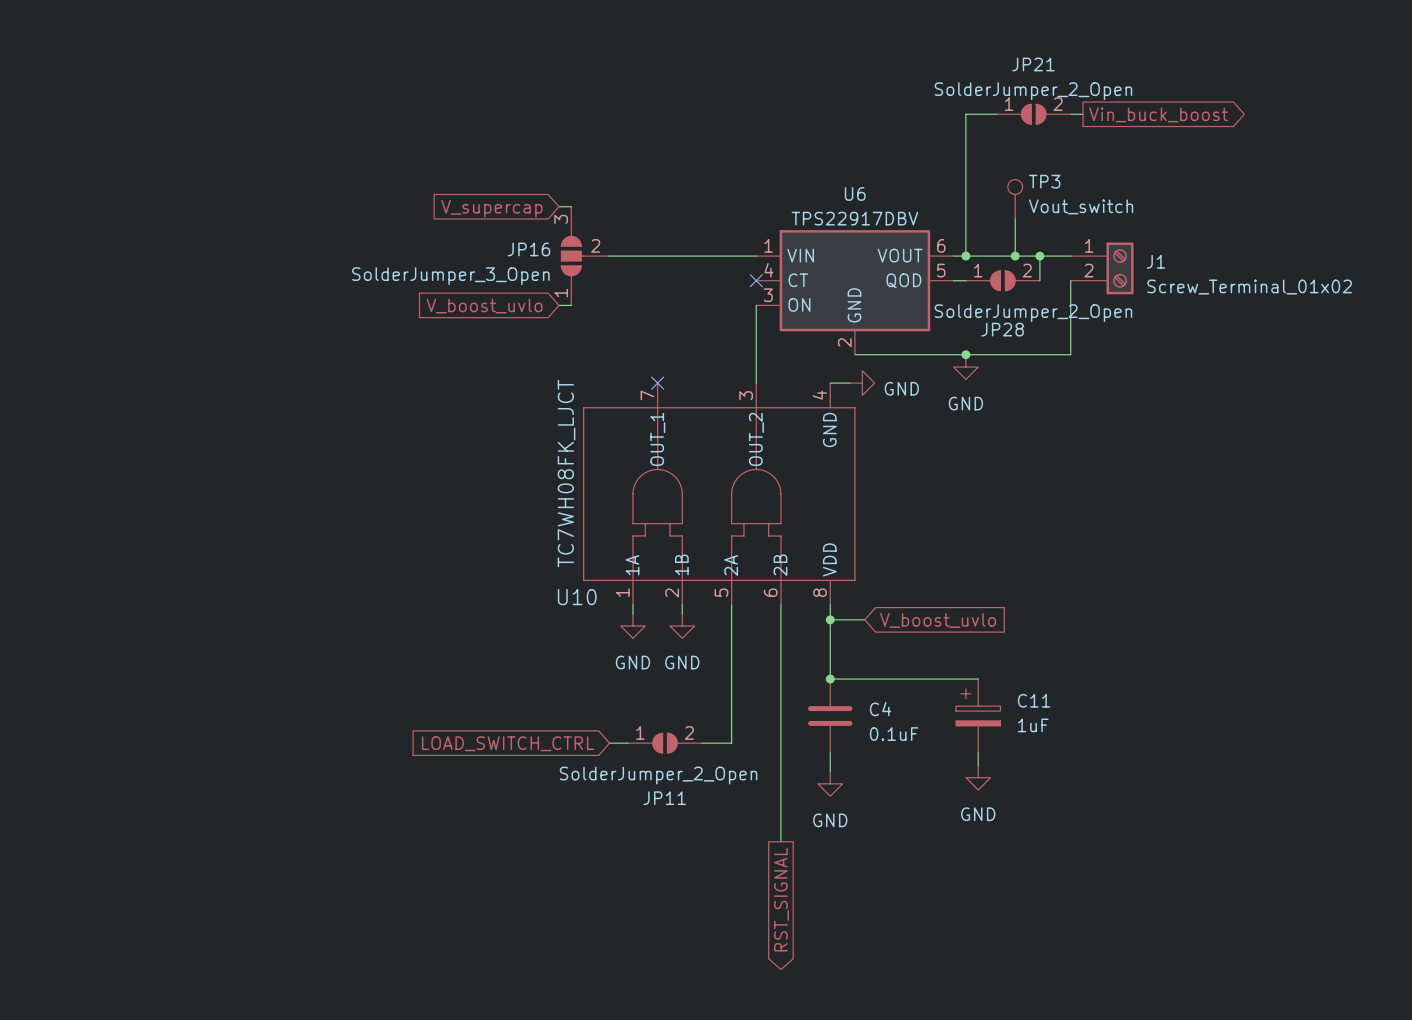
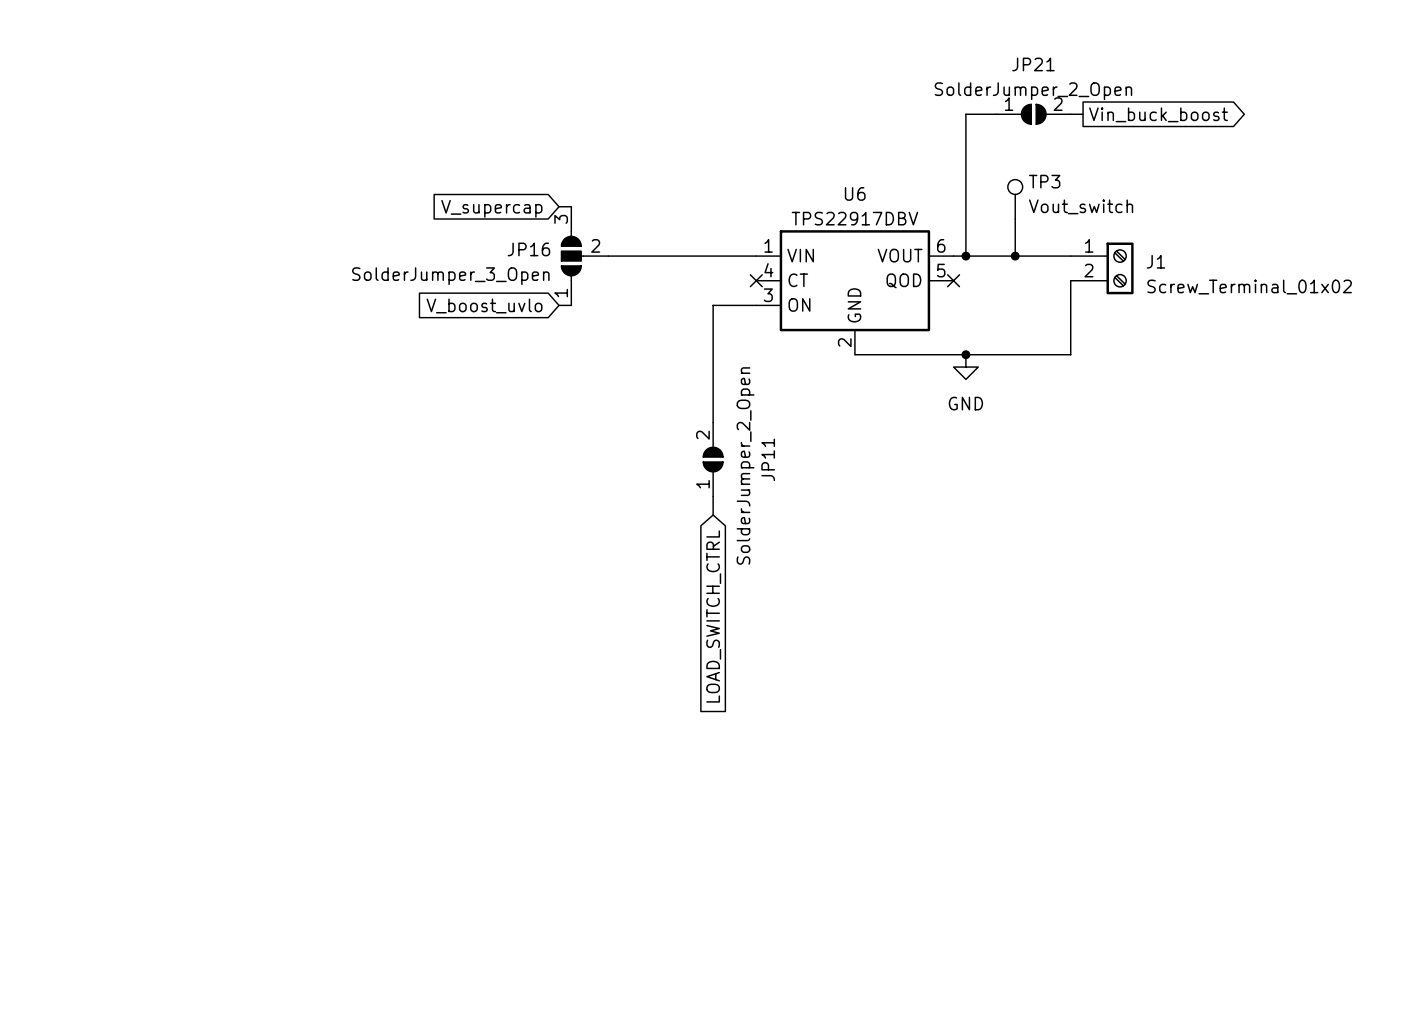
wire: (1039, 256) (1039, 280) -> none
junction: (1039, 256) -> none
wire: (953, 280) (965, 280) -> none
no-connect mark: none -> (953, 280)
JP28: SolderJumper_2_Open (1002, 280) -> none
wire: (756, 305) (756, 383) -> (756, 305) (713, 305) (713, 422)
no-connect mark: (657, 383) -> none
wire: (830, 383) (850, 383) -> none
power symbol: GND (862, 383) -> none
U10: TC7WH08FK_LJCT (719, 494) -> none
wire: none -> (713, 496) (713, 515)
wire: (632, 605) (632, 613) -> none
wire: (682, 605) (682, 613) -> none
wire: (731, 605) (731, 743) (702, 743) -> none
wire: (780, 605) (780, 841) -> none
wire: (830, 605) (830, 679) (978, 679) -> none
global label: none -> LOAD_SWITCH_CTRL (713, 616)
wire: (830, 619) (864, 619) -> none
junction: (830, 619) -> none
global label: V_boost_uvlo (938, 620) -> none
power symbol: GND (632, 626) -> none
power symbol: GND (682, 626) -> none
junction: (830, 679) -> none
C4: 0.1uF (830, 716) -> none
C11: 1uF (978, 716) -> none
global label: LOAD_SWITCH_CTRL (508, 743) -> none
wire: (609, 743) (628, 743) -> none
JP11 rotation: 0° (665, 743) -> 90° counterclockwise (713, 459)
JP11 position: (665, 743) -> (713, 459)
wire: (830, 753) (830, 771) -> none
wire: (978, 753) (978, 765) -> none
power symbol: GND (978, 777) -> none
power symbol: GND (830, 783) -> none
global label: RST_SIGNAL (781, 899) -> none

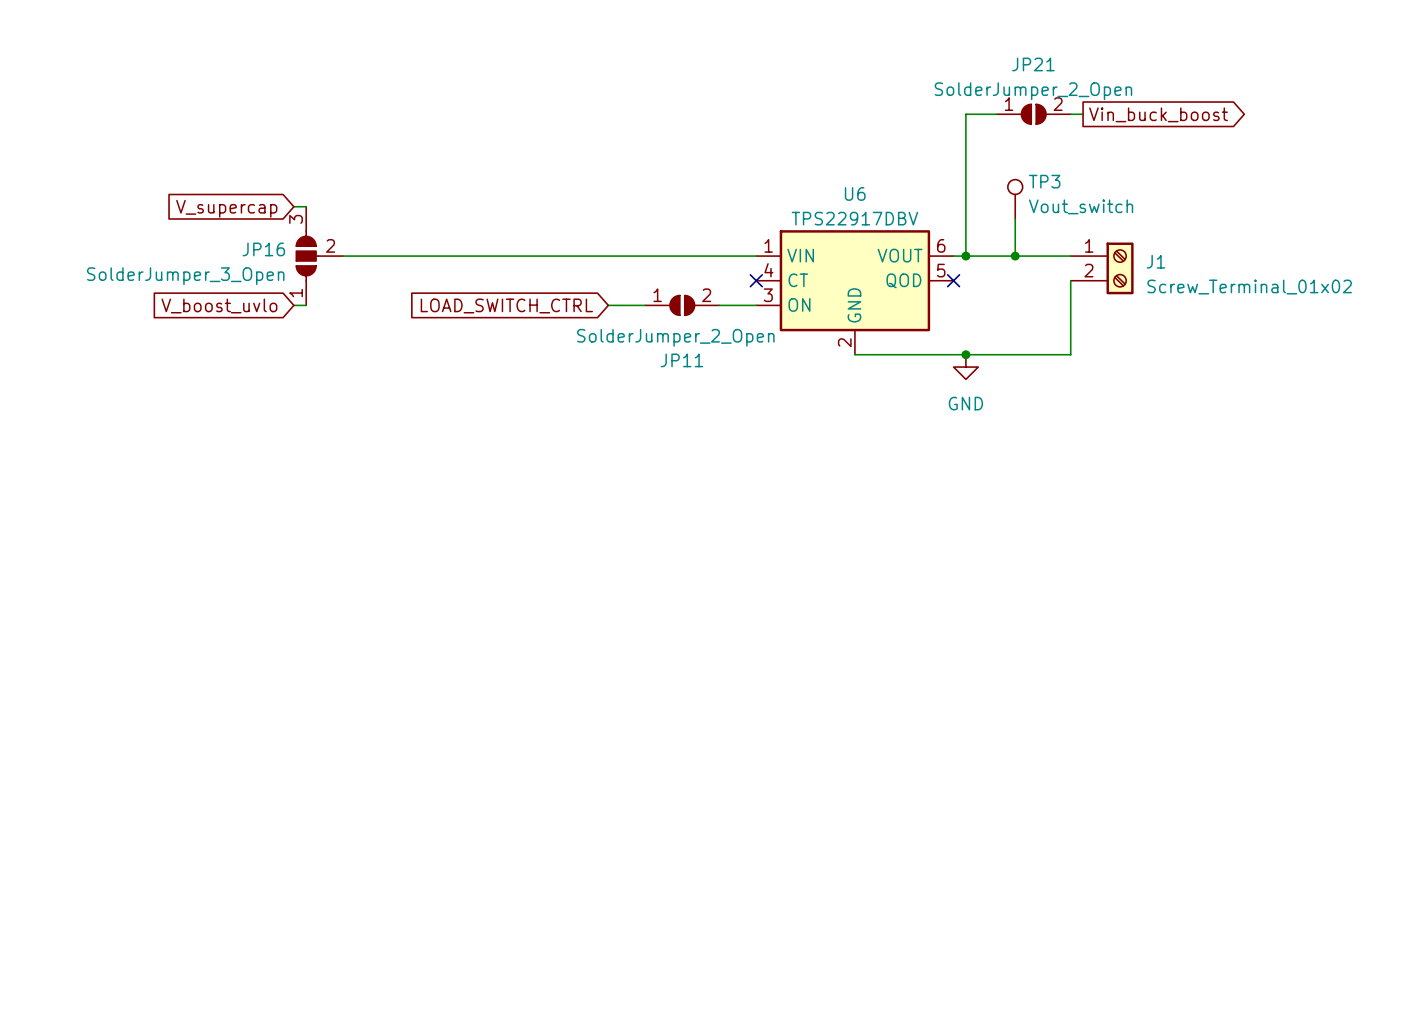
wire: none -> (293, 206) (306, 206)
wire: (558, 206) (571, 206) -> none
global label: none -> V_supercap (226, 208)
global label: V_supercap (491, 208) -> none
wire: none -> (343, 256) (608, 256)
JP16 position: (584, 256) -> (319, 256)
global label: none -> V_boost_uvlo (219, 305)
wire: none -> (293, 305) (306, 305)
global label: V_boost_uvlo (484, 305) -> none
wire: (558, 305) (571, 305) -> none
wire: none -> (608, 305) (645, 305)
wire: (719, 305) (713, 305) (713, 422) -> none
JP11 rotation: 0° (713, 459) -> 90° clockwise (682, 305)
JP11 position: (713, 459) -> (682, 305)
wire: (713, 496) (713, 515) -> none
global label rotation: 0° (713, 616) -> 90° clockwise (506, 305)
global label position: LOAD_SWITCH_CTRL (713, 616) -> LOAD_SWITCH_CTRL (506, 305)

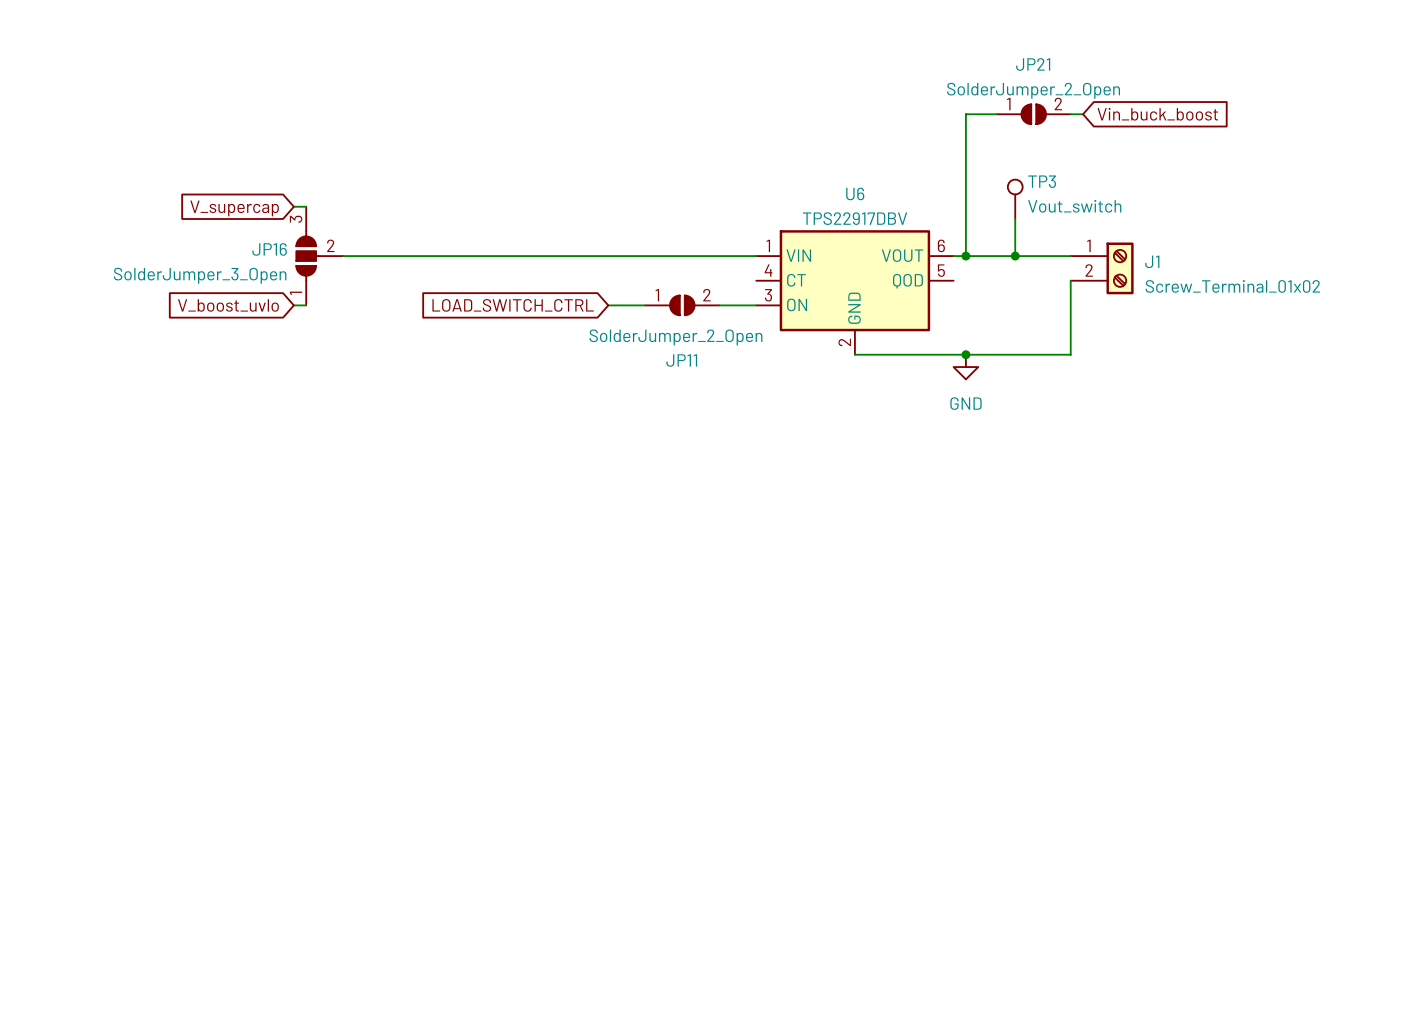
global label shape: output (1158, 114) -> input (1157, 114)
no-connect mark: (756, 280) -> none
no-connect mark: (953, 280) -> none

